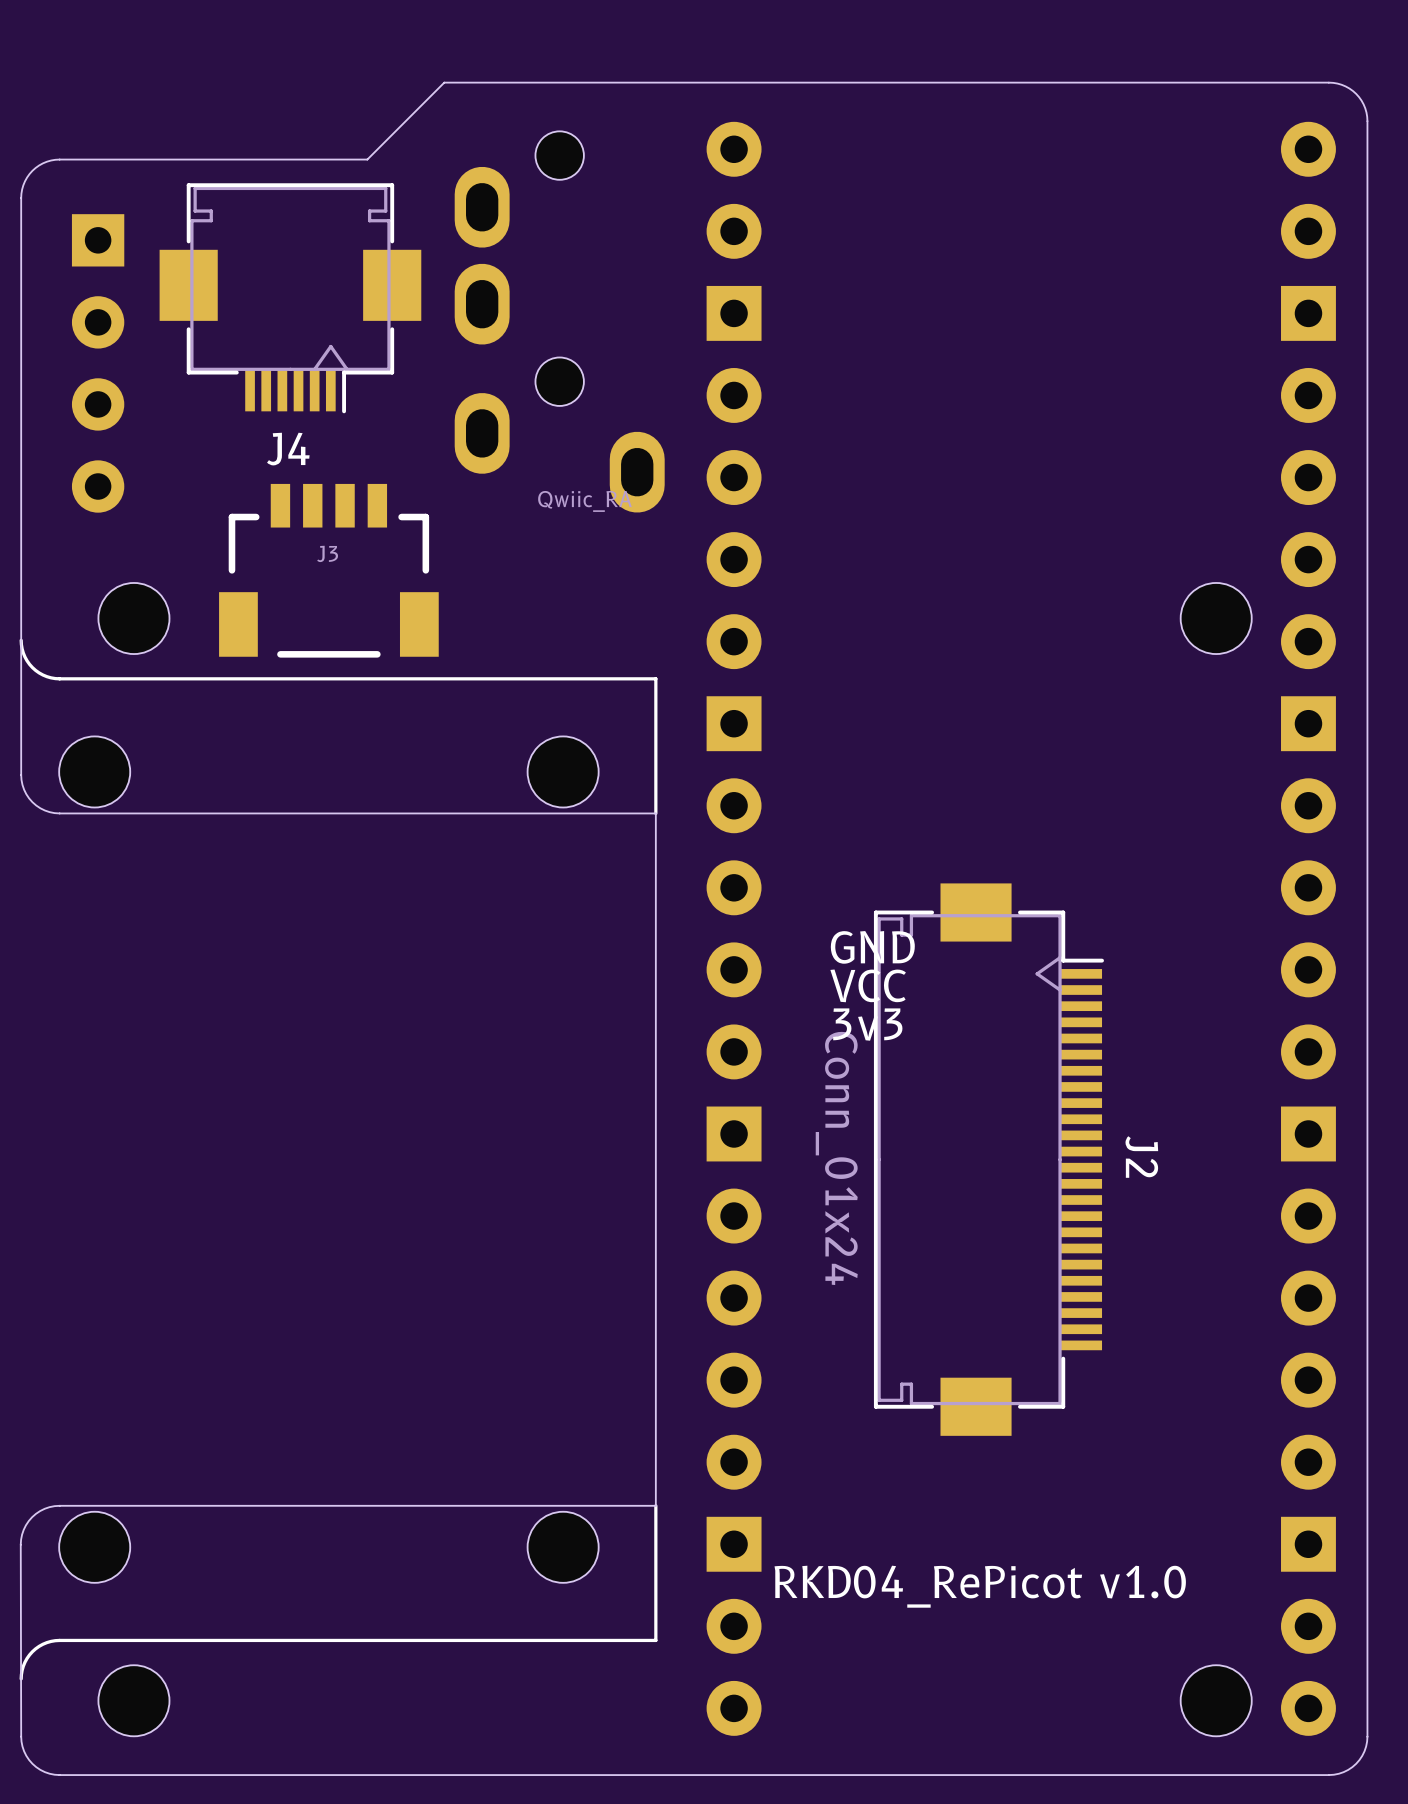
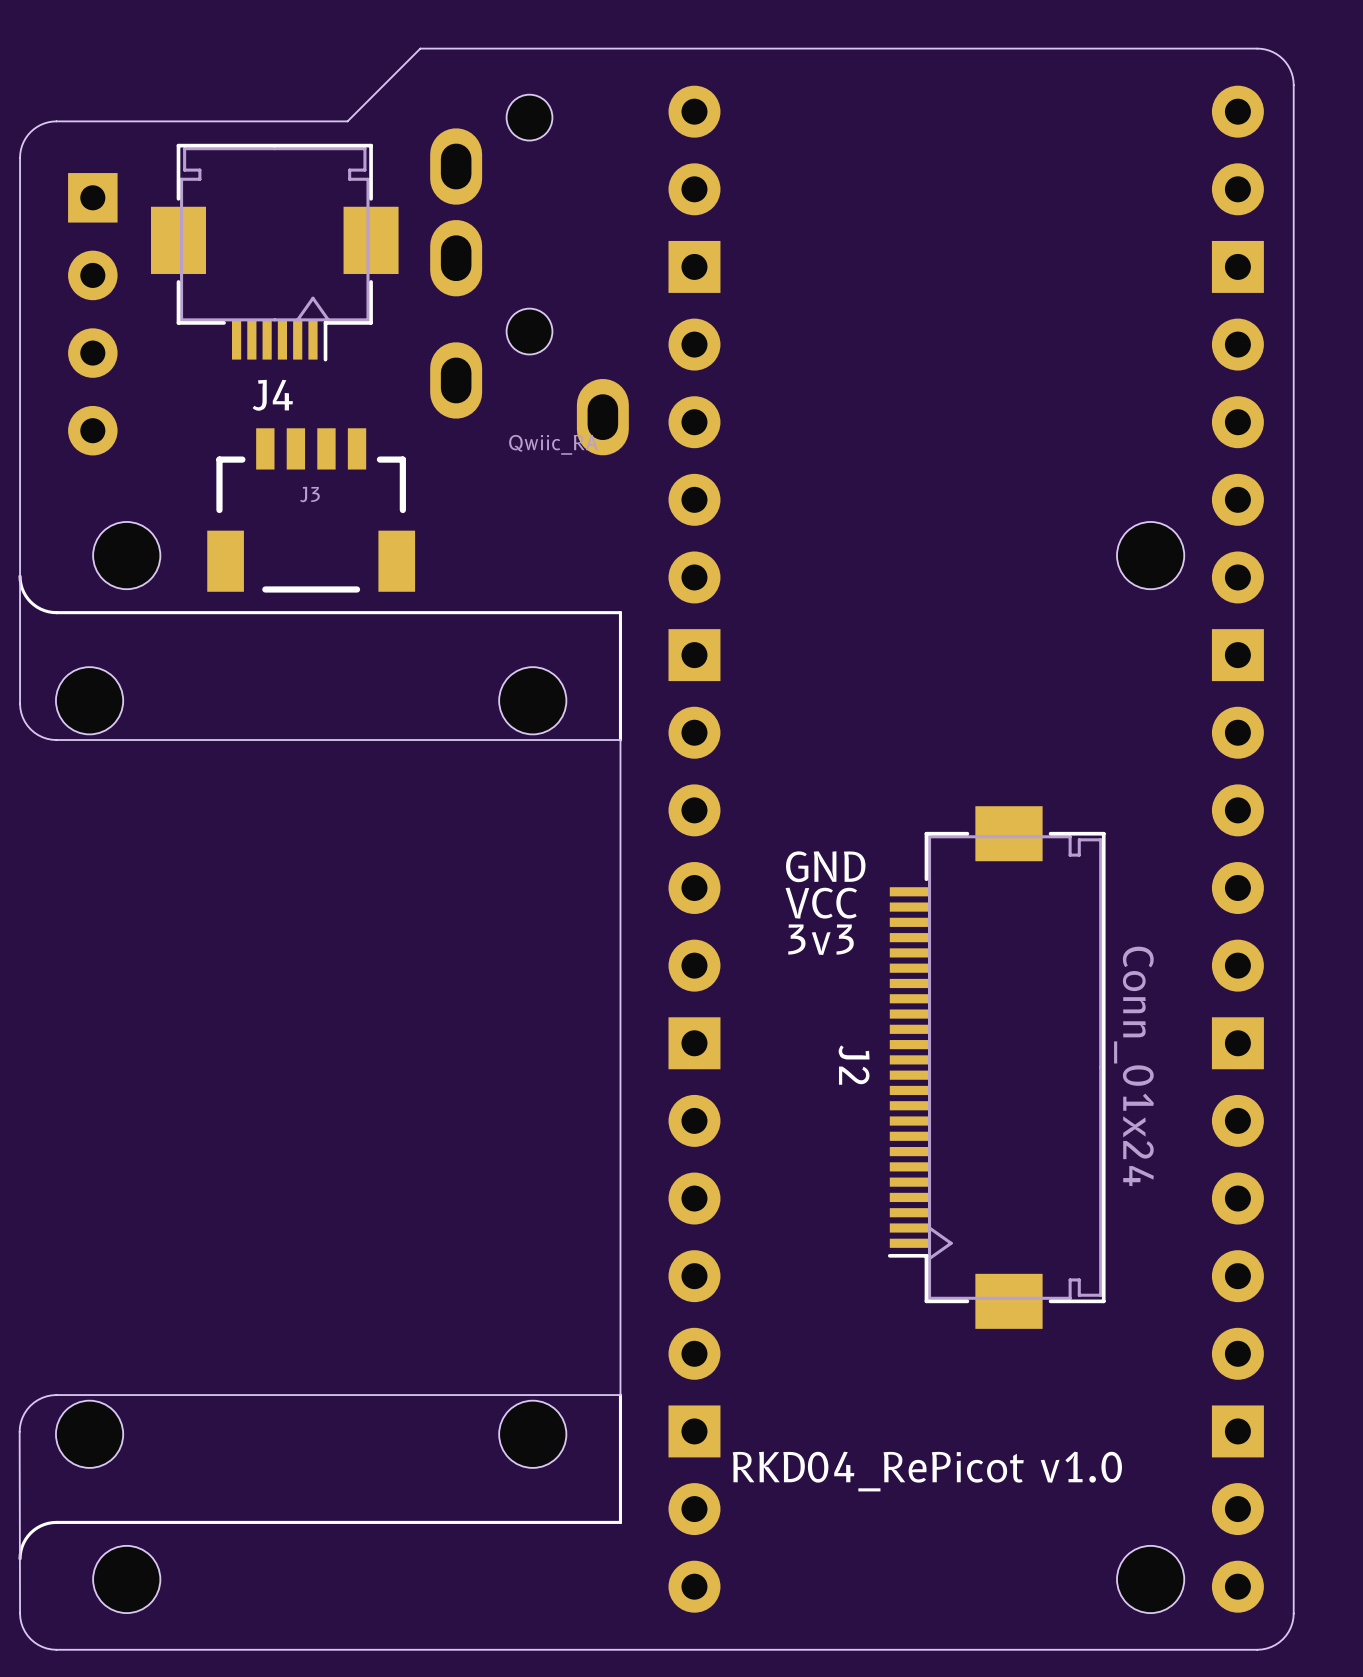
J2 rotation: 0° (988, 1159) -> 180° (996, 1067)

